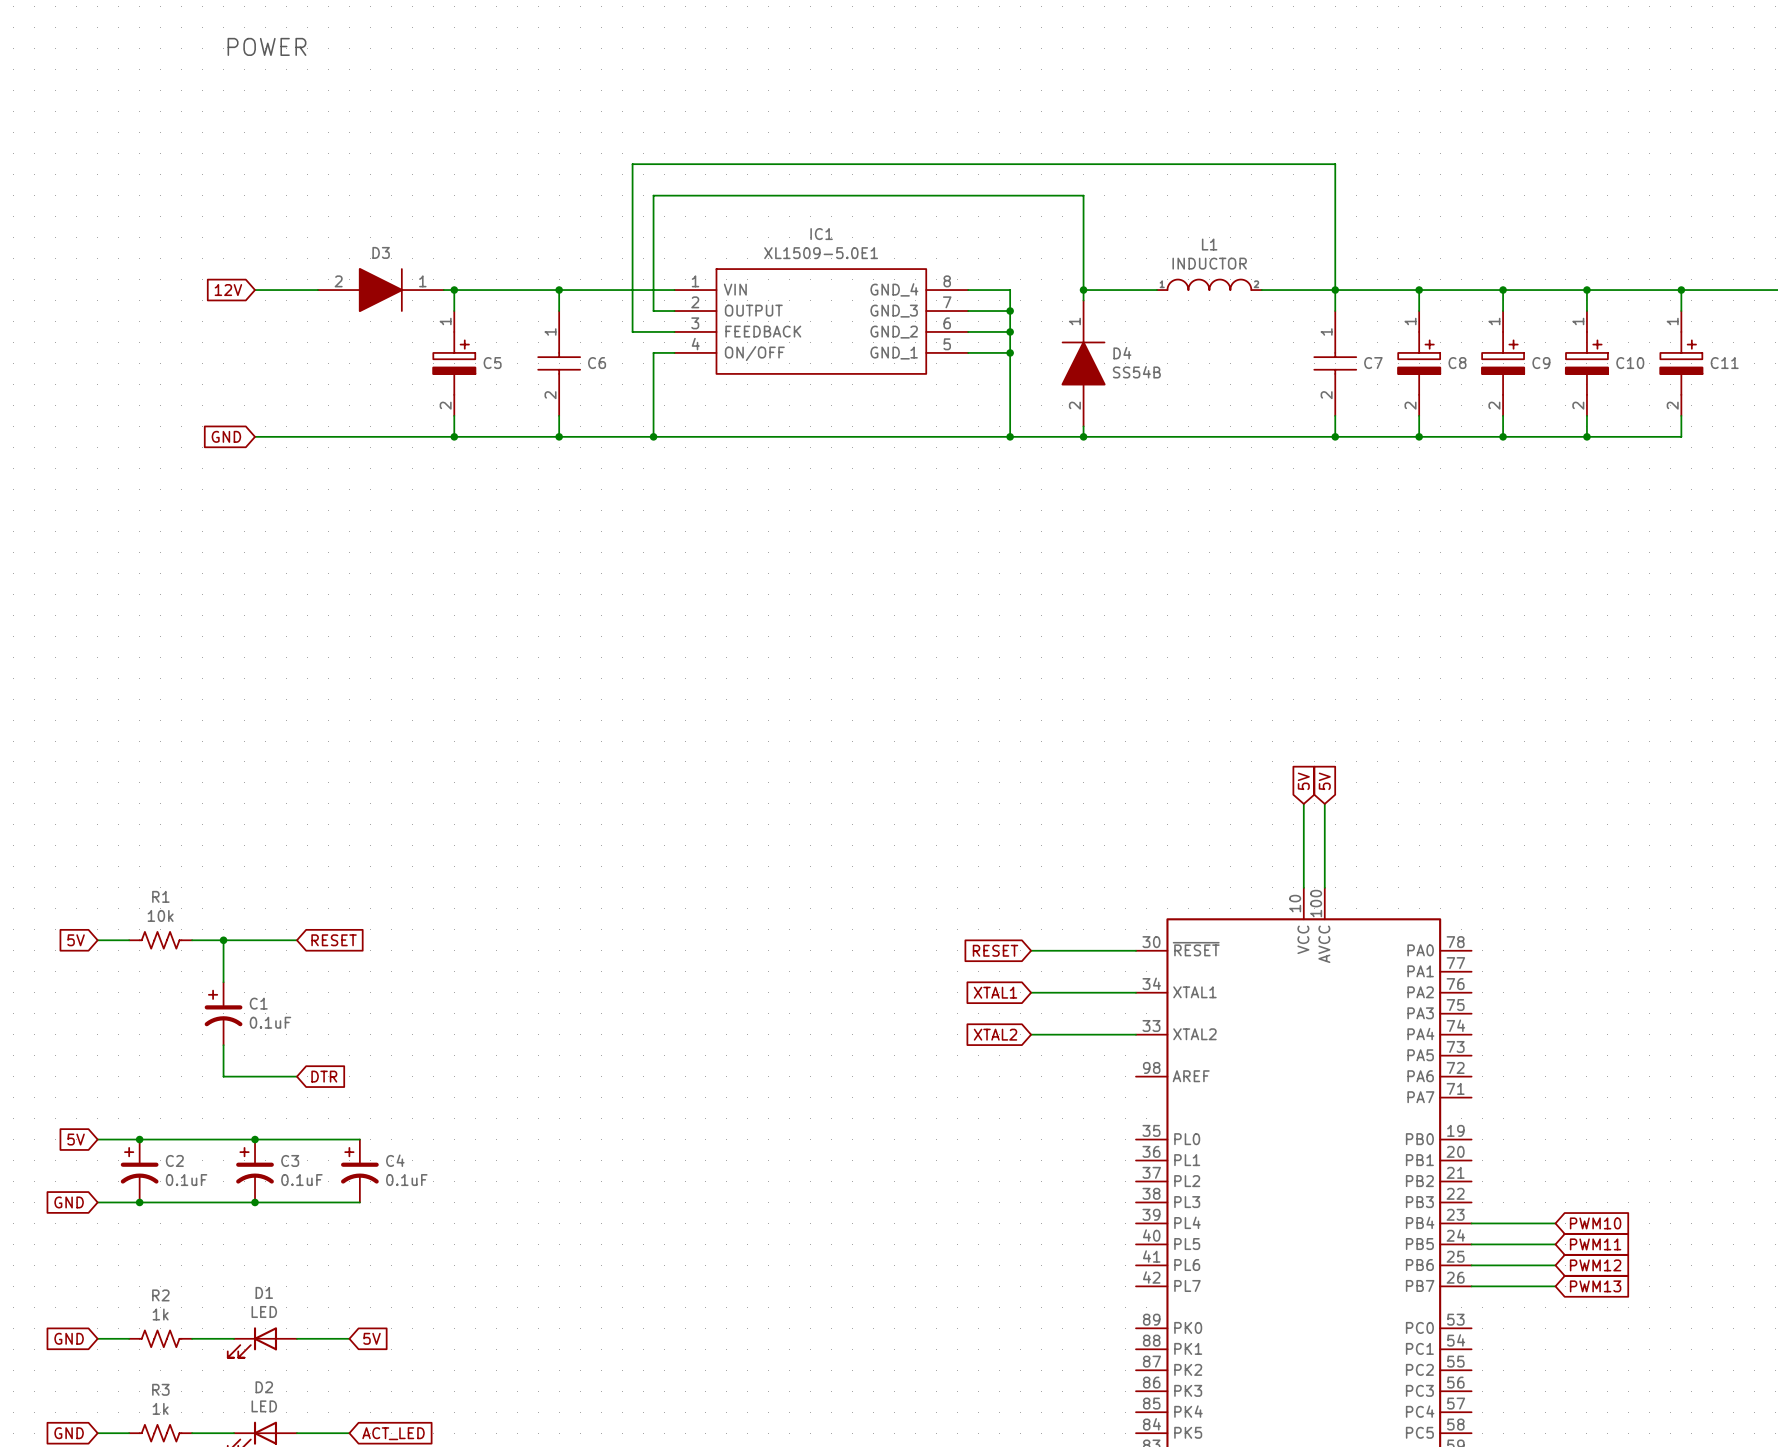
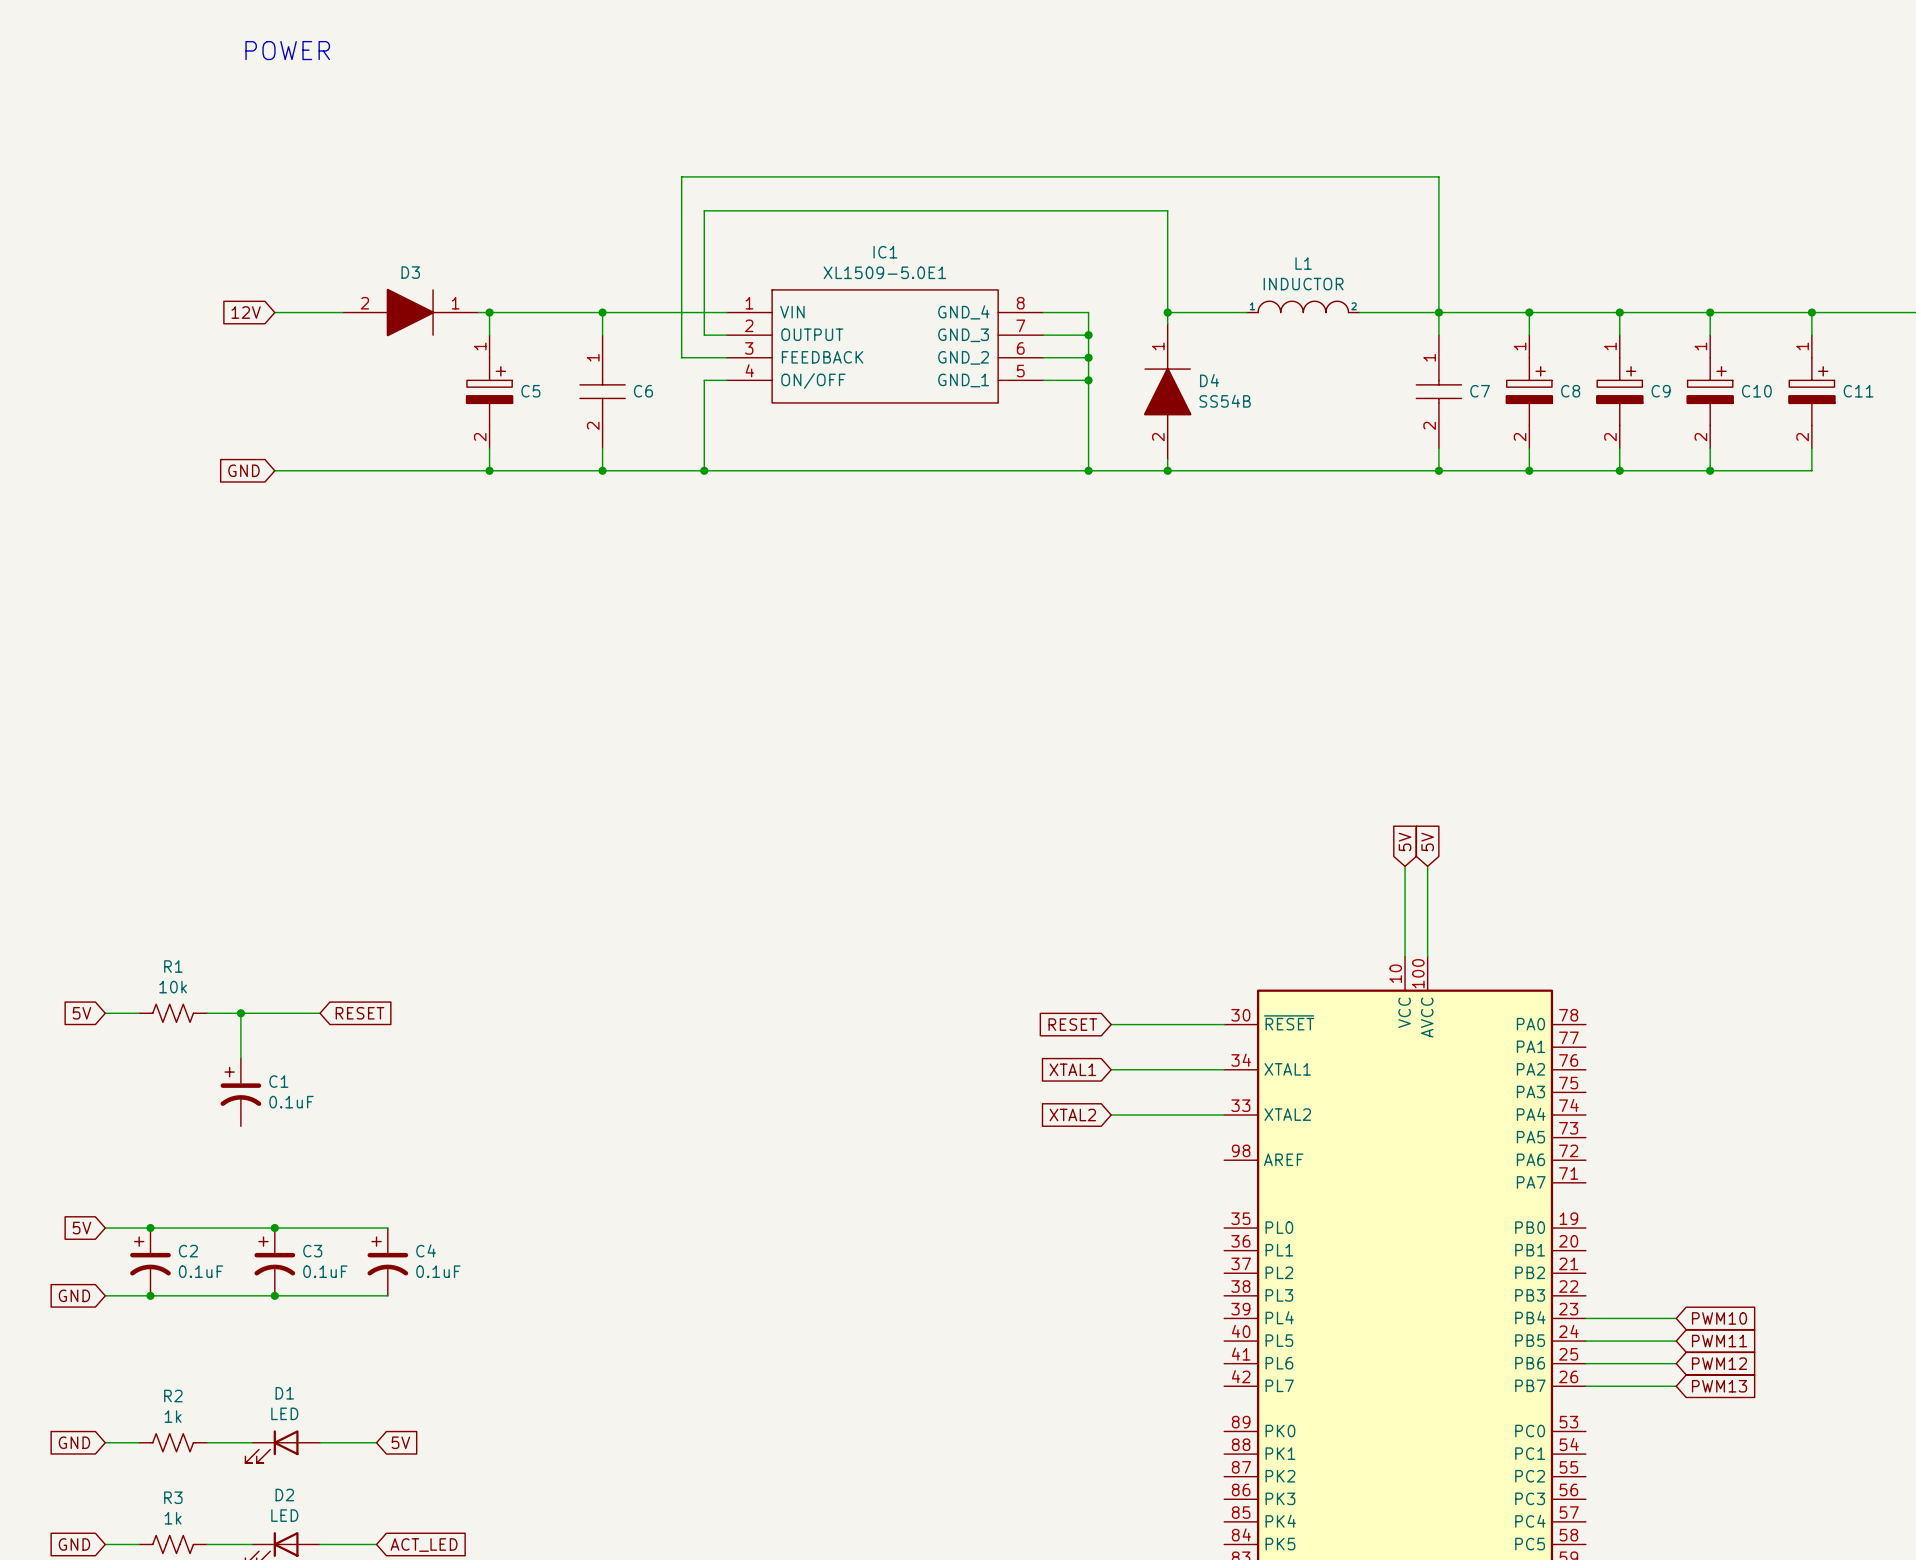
wire: (223, 1045) (223, 1076) (296, 1076) -> none
global label: DTR (324, 1076) -> none

